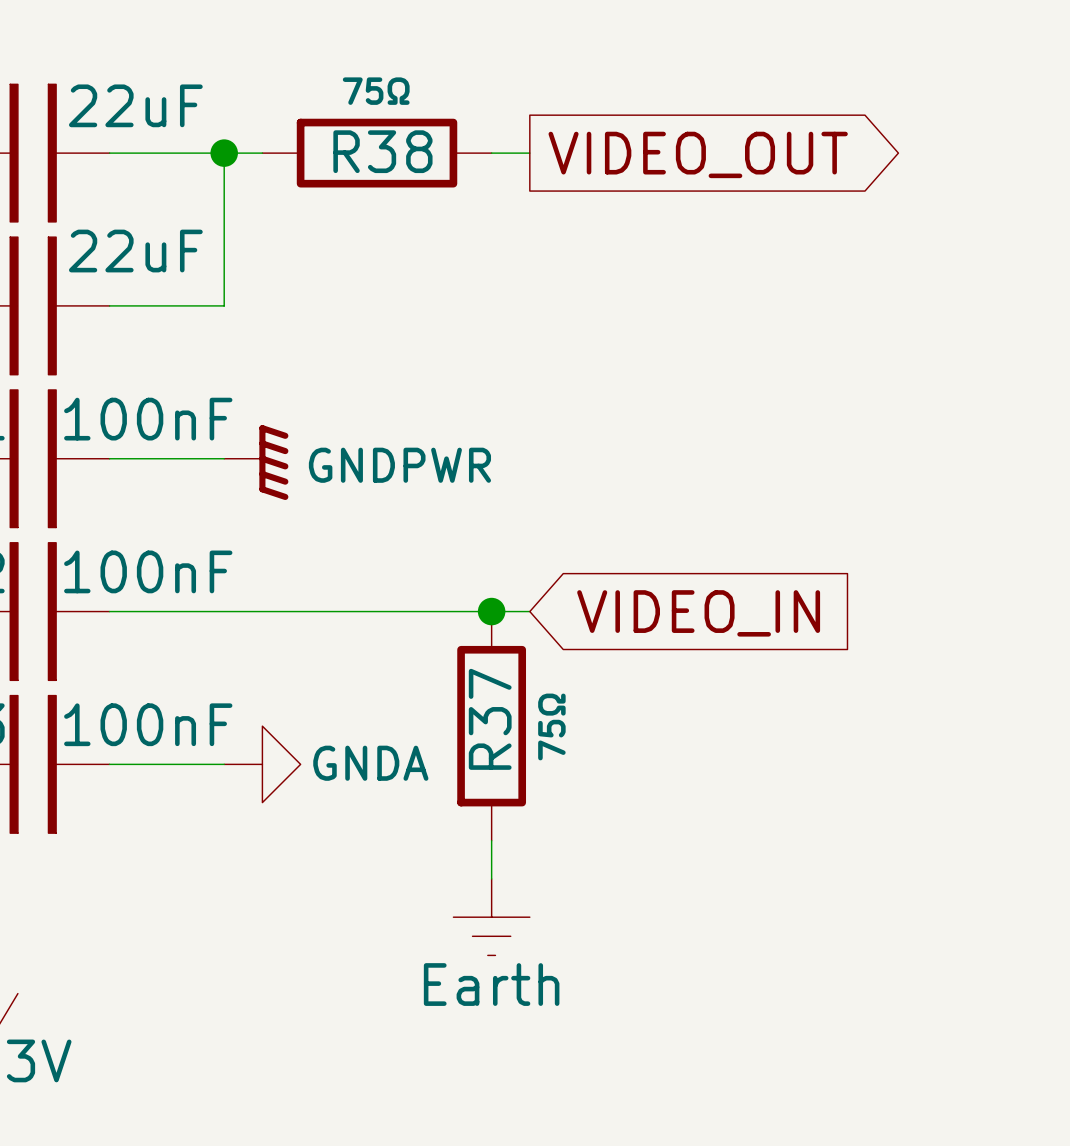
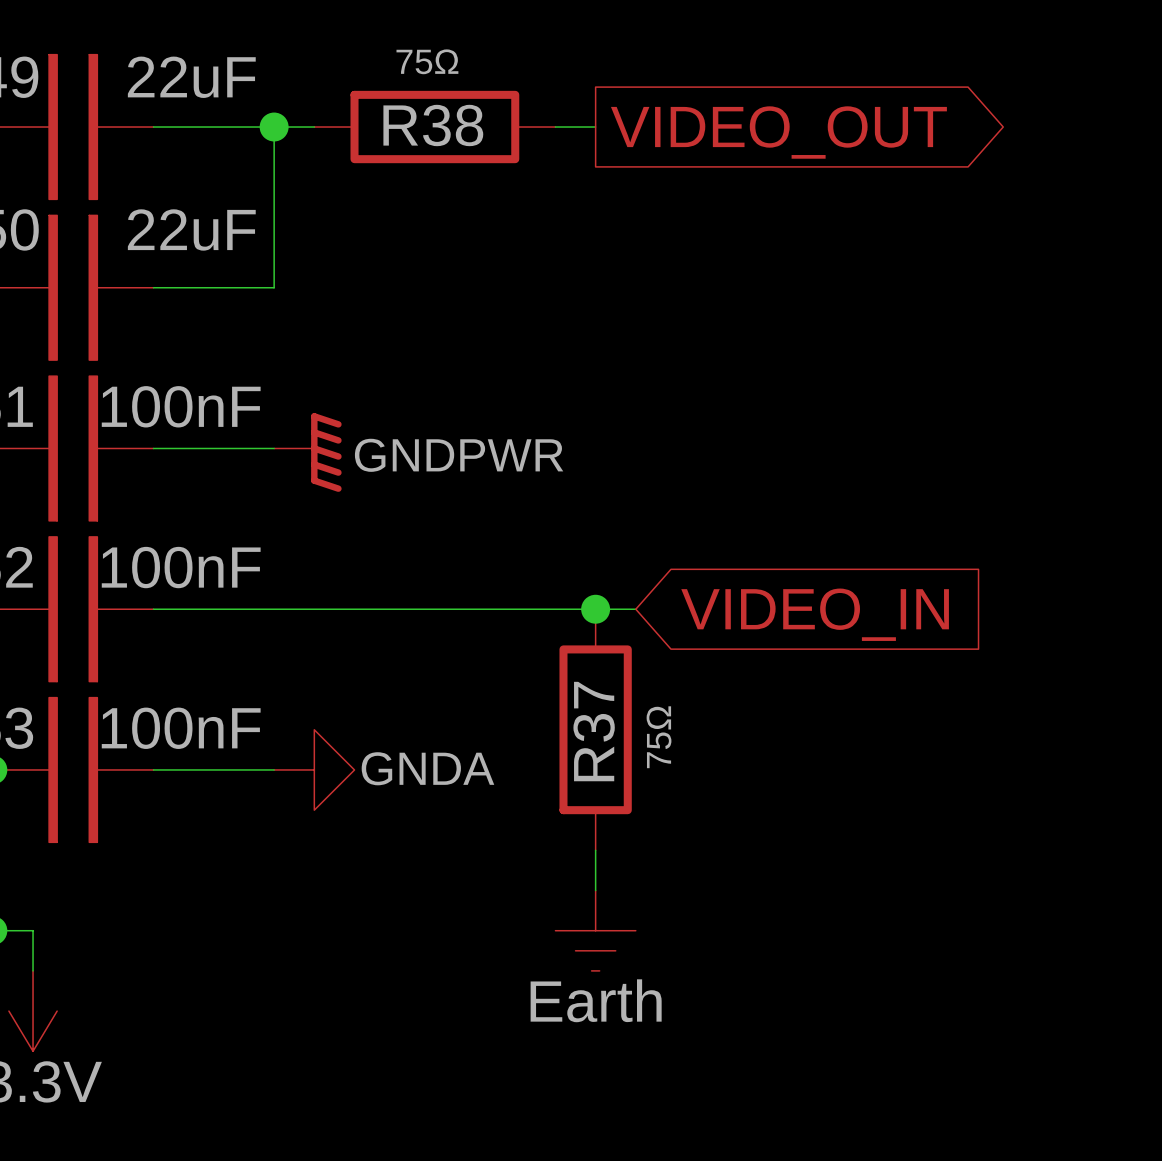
junction position: (491, 611) -> (595, 609)
wire: none -> (595, 609) (635, 609)
global label position: VIDEO_IN (698, 613) -> VIDEO_IN (815, 614)
R37 position: (491, 726) -> (595, 729)
wire: (491, 840) (491, 878) -> (595, 850) (595, 890)
power symbol position: Earth (491, 917) -> Earth (595, 930)

